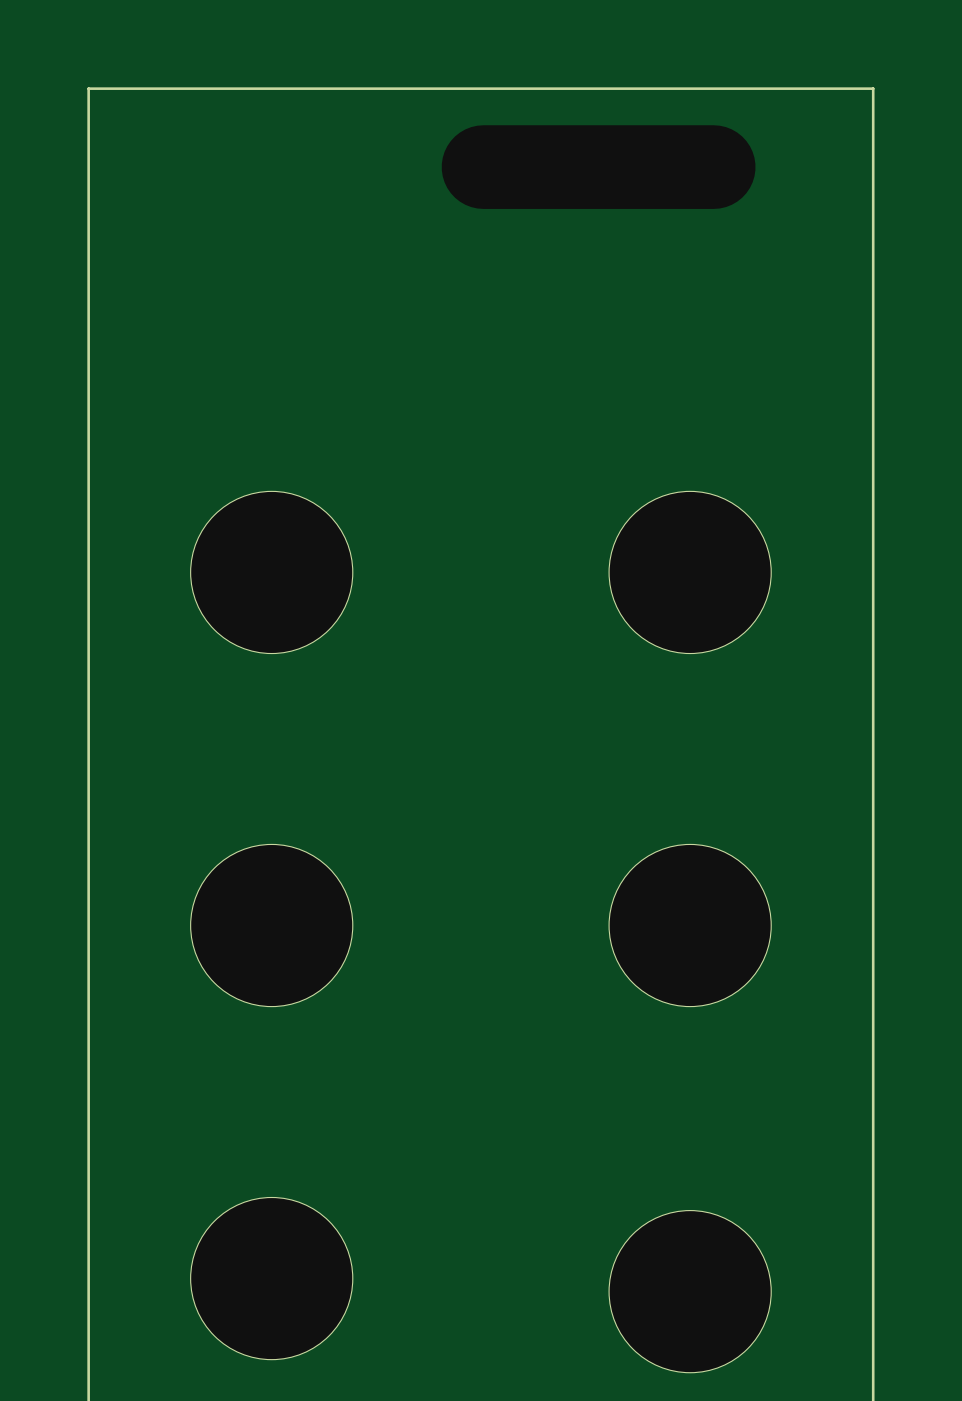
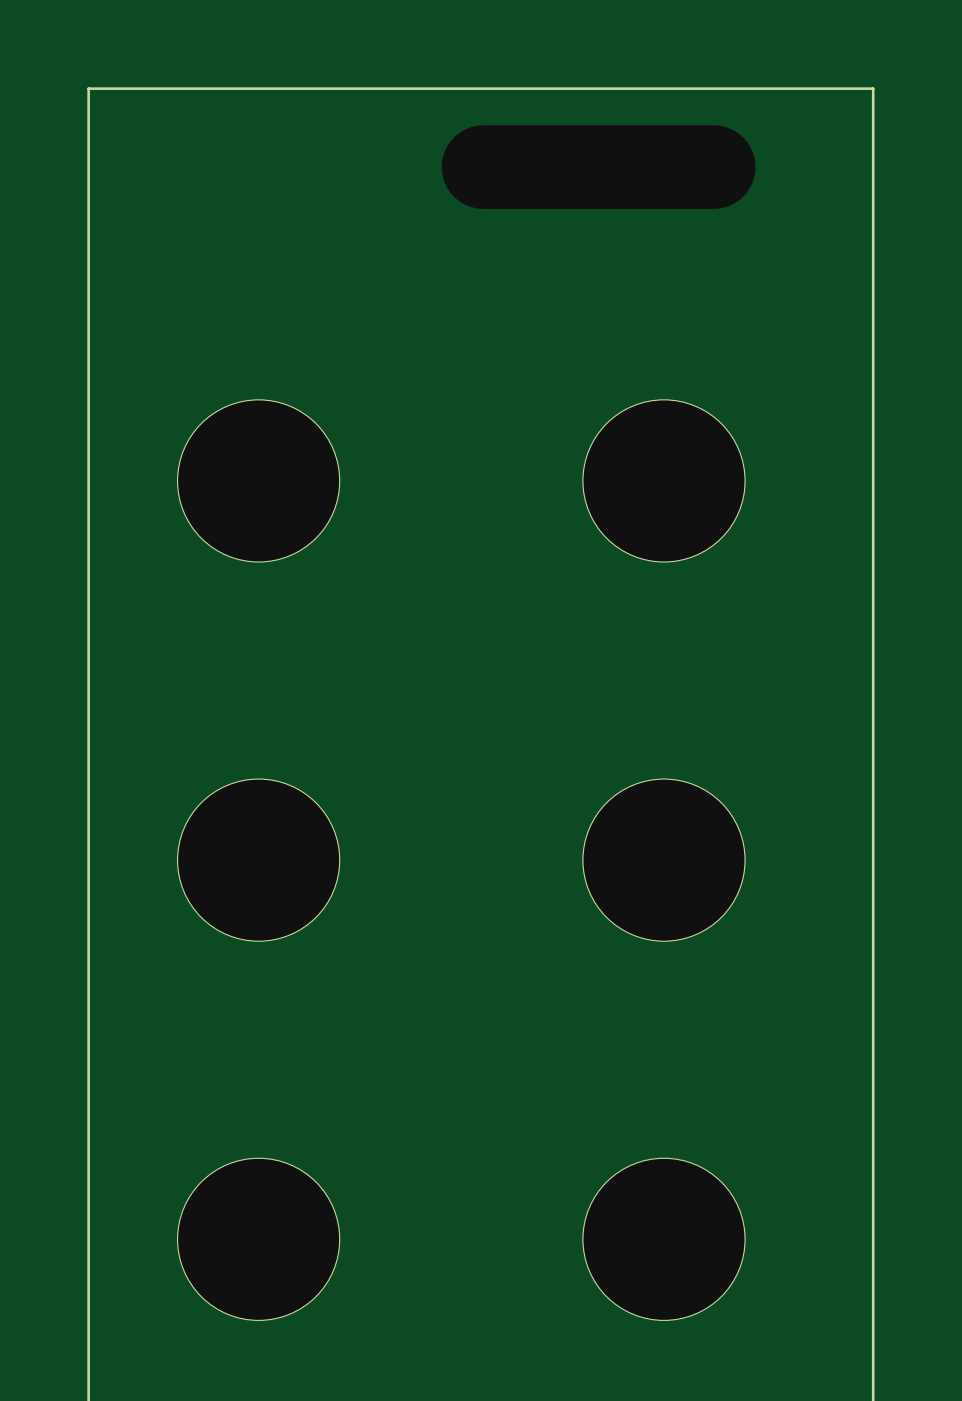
part position: (271, 572) -> (258, 480)
part position: (690, 572) -> (663, 480)
part position: (271, 925) -> (258, 860)
part position: (690, 925) -> (663, 860)
part position: (271, 1278) -> (258, 1239)
part position: (690, 1291) -> (663, 1239)

